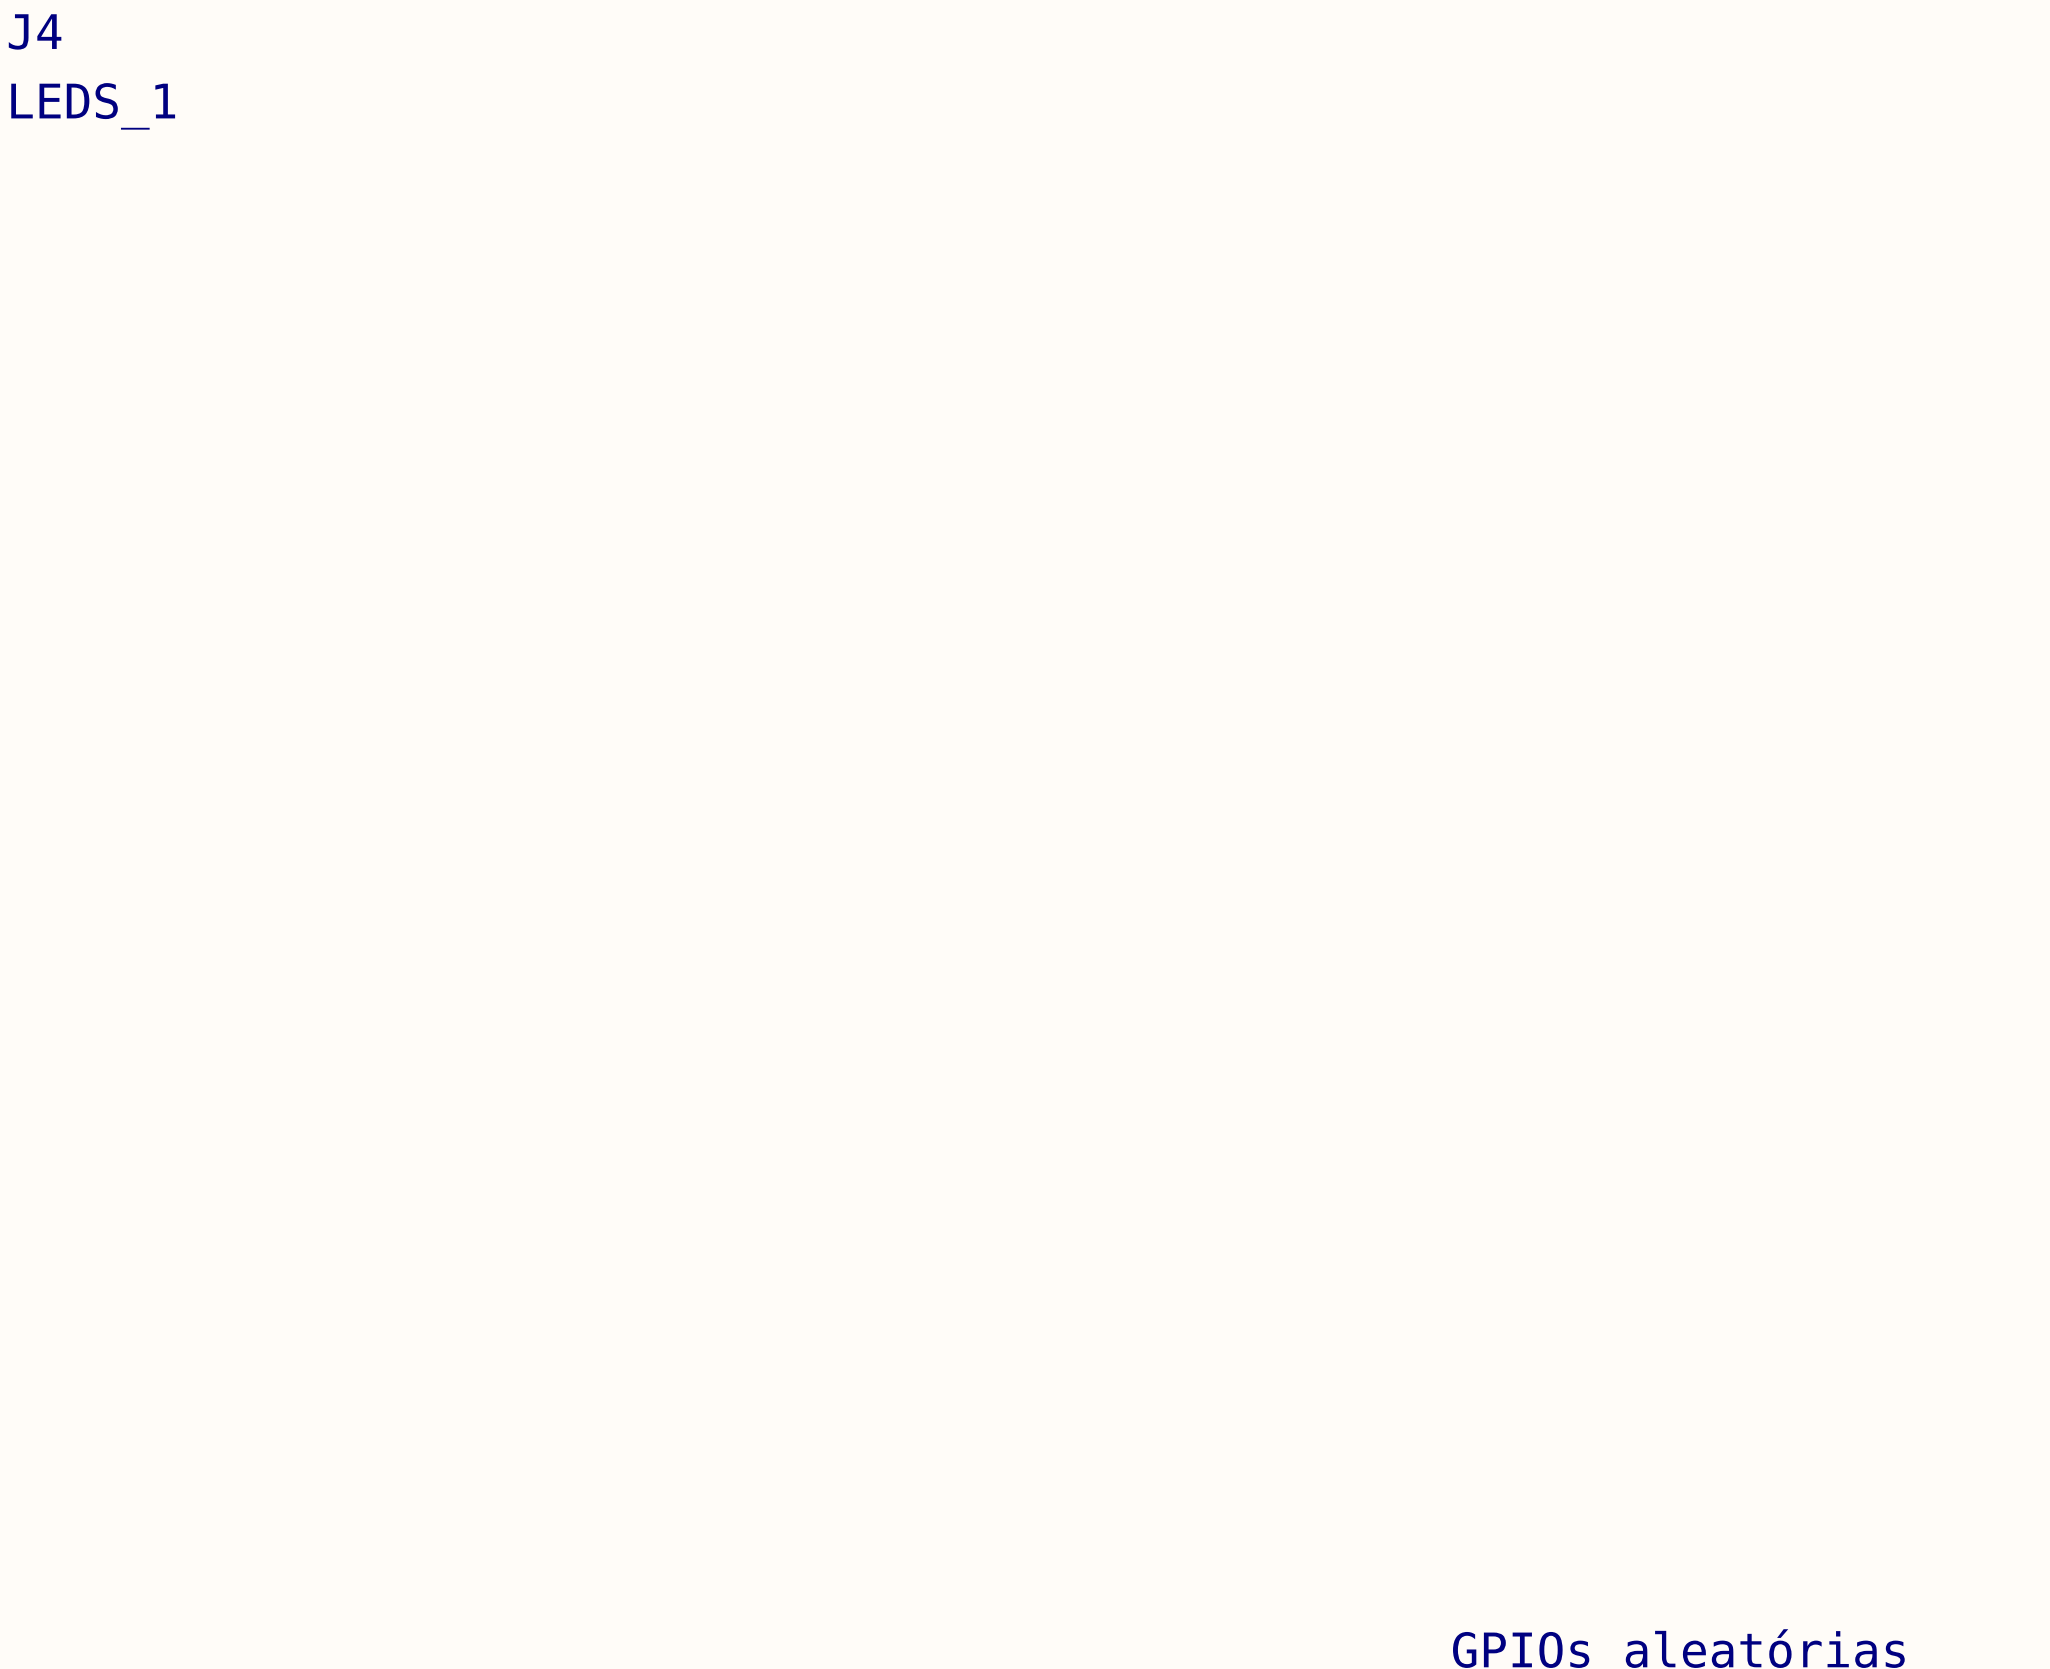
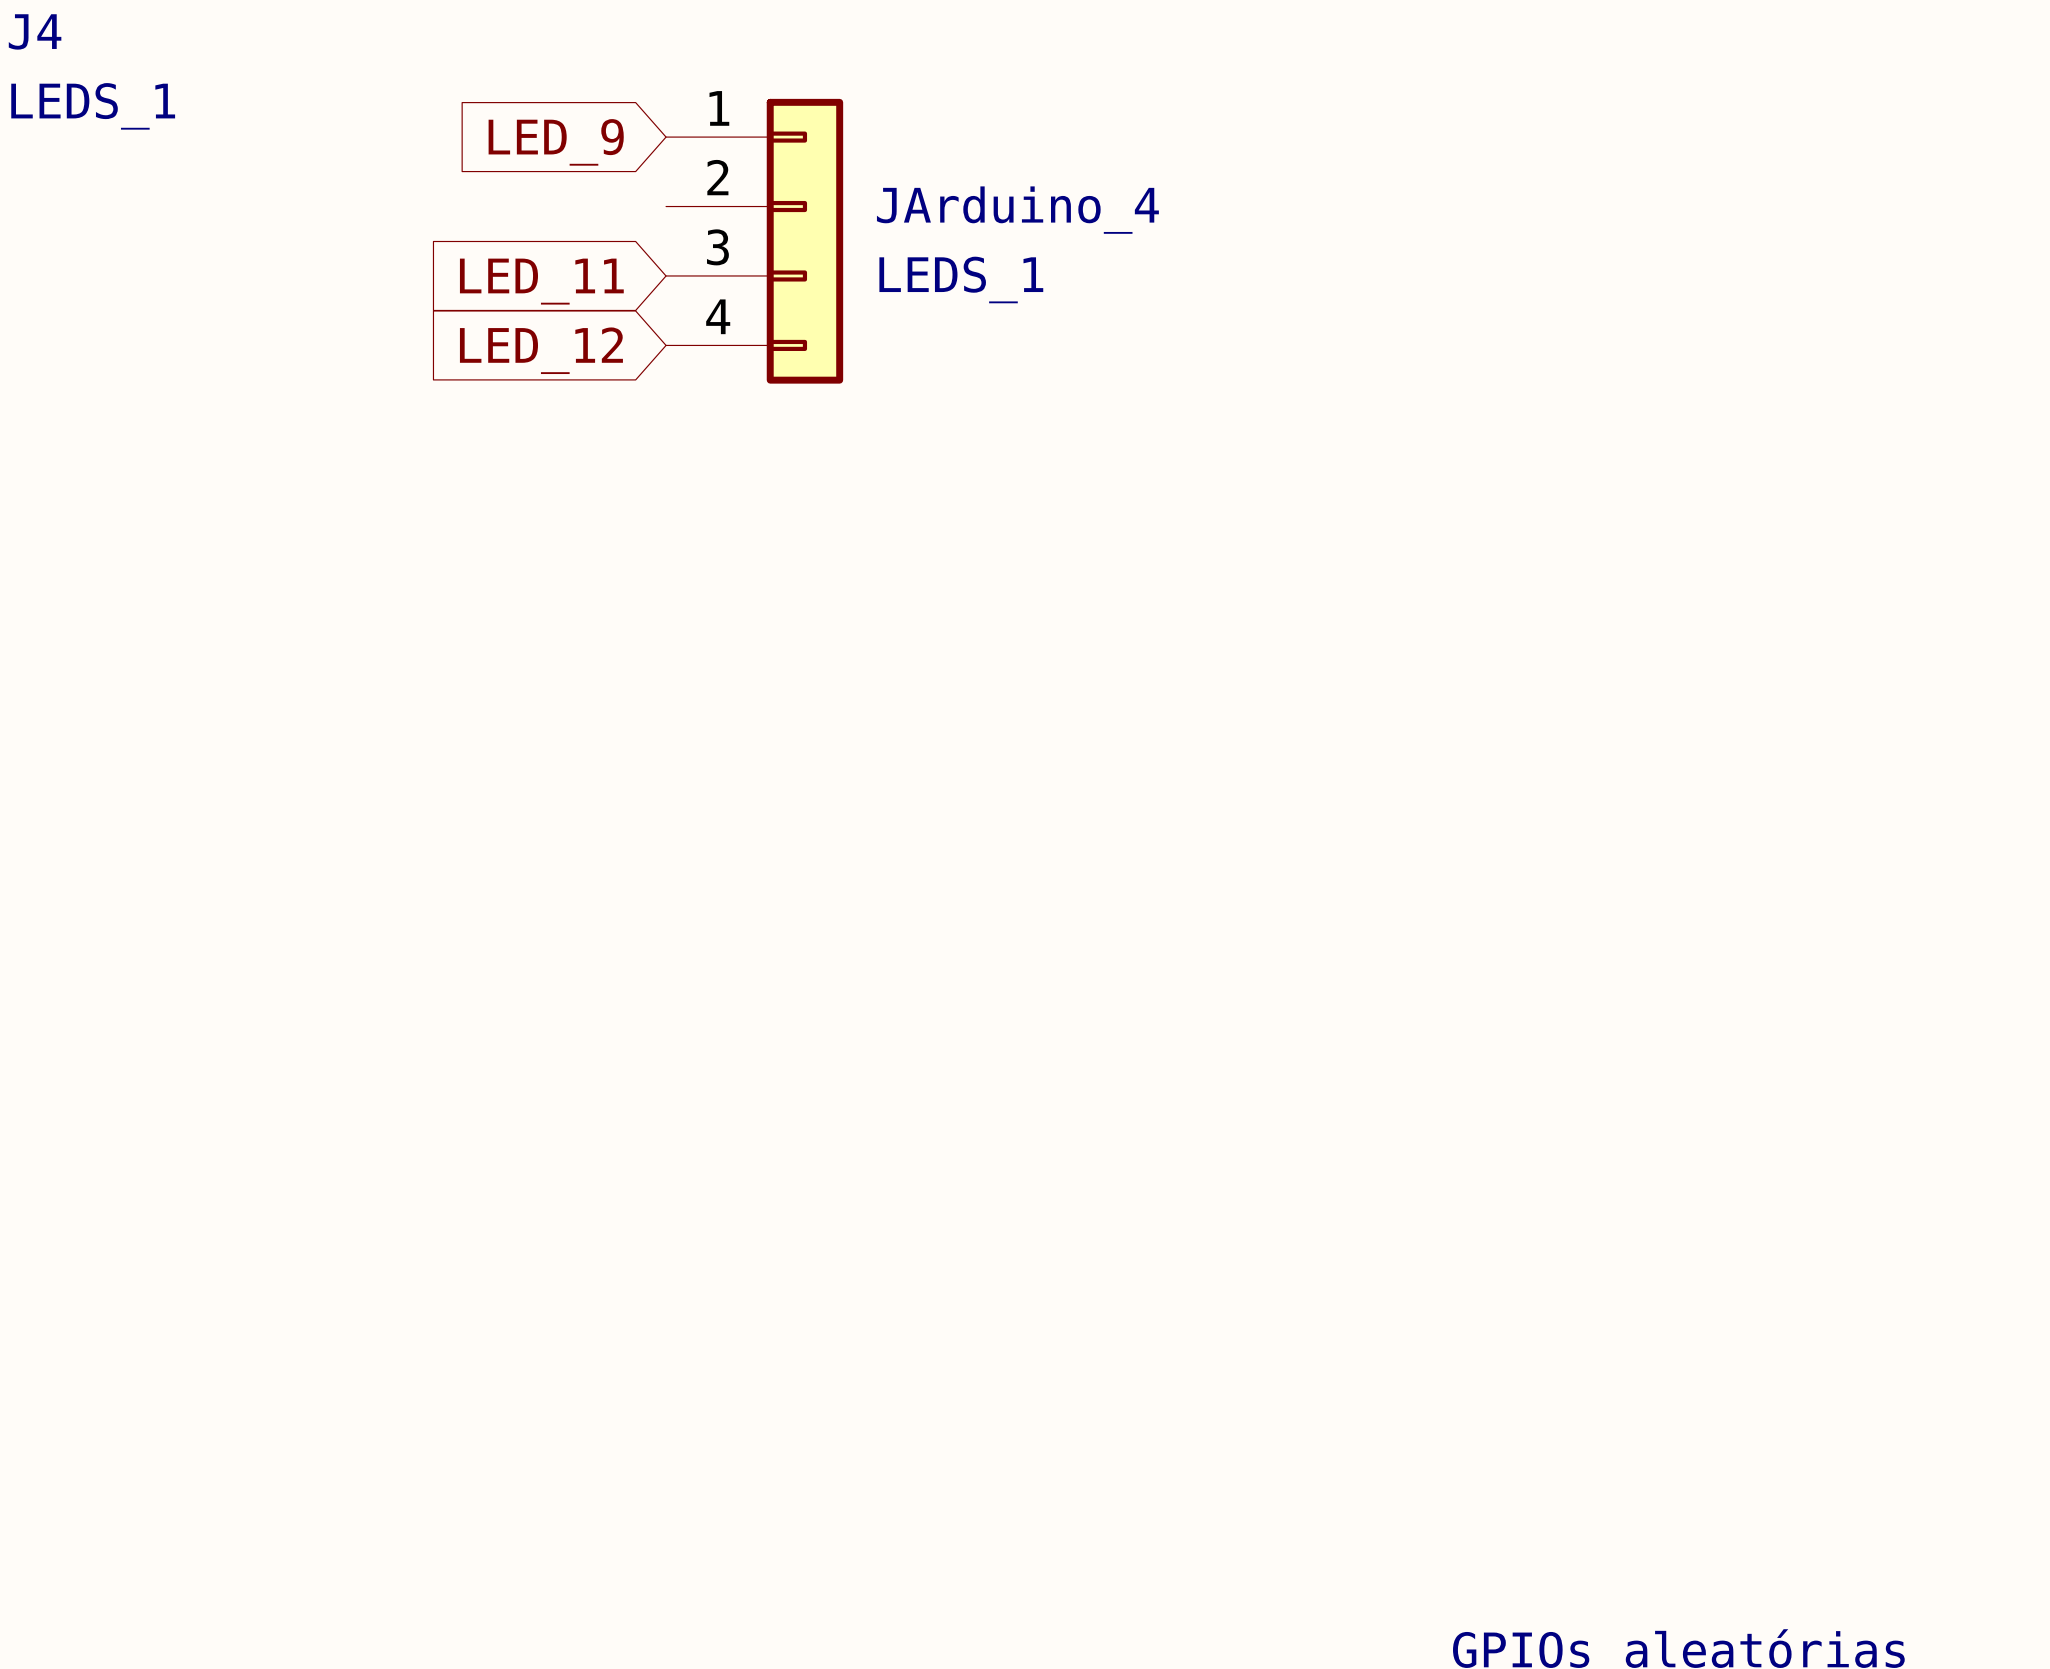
global label: none -> LED_9 (556, 142)
JArduino_4: none -> LEDS_1 (754, 241)
global label: none -> LED_11 (541, 281)
global label: none -> LED_12 (541, 350)

